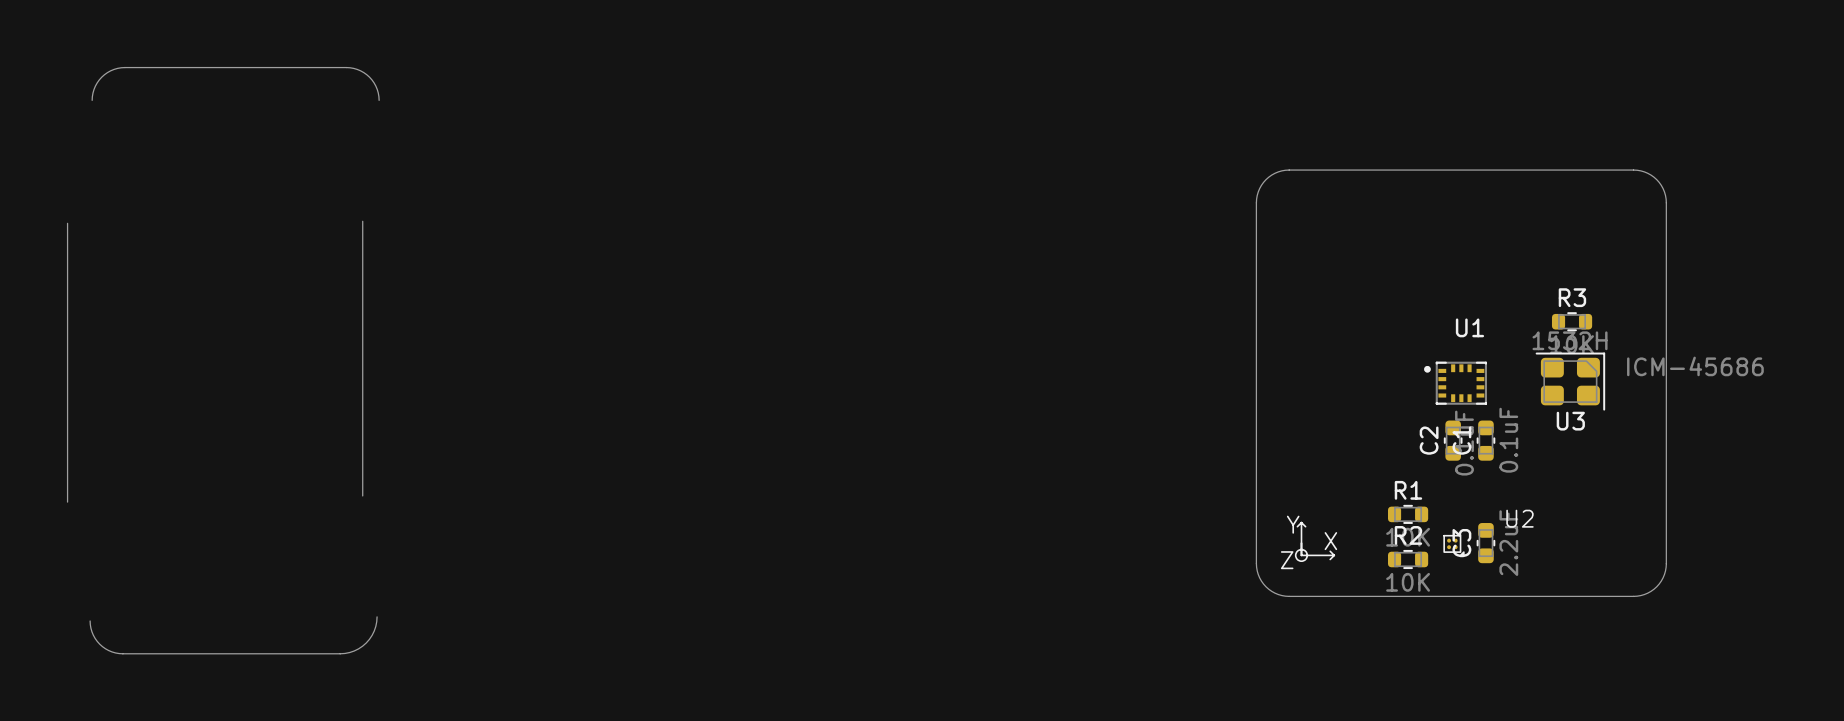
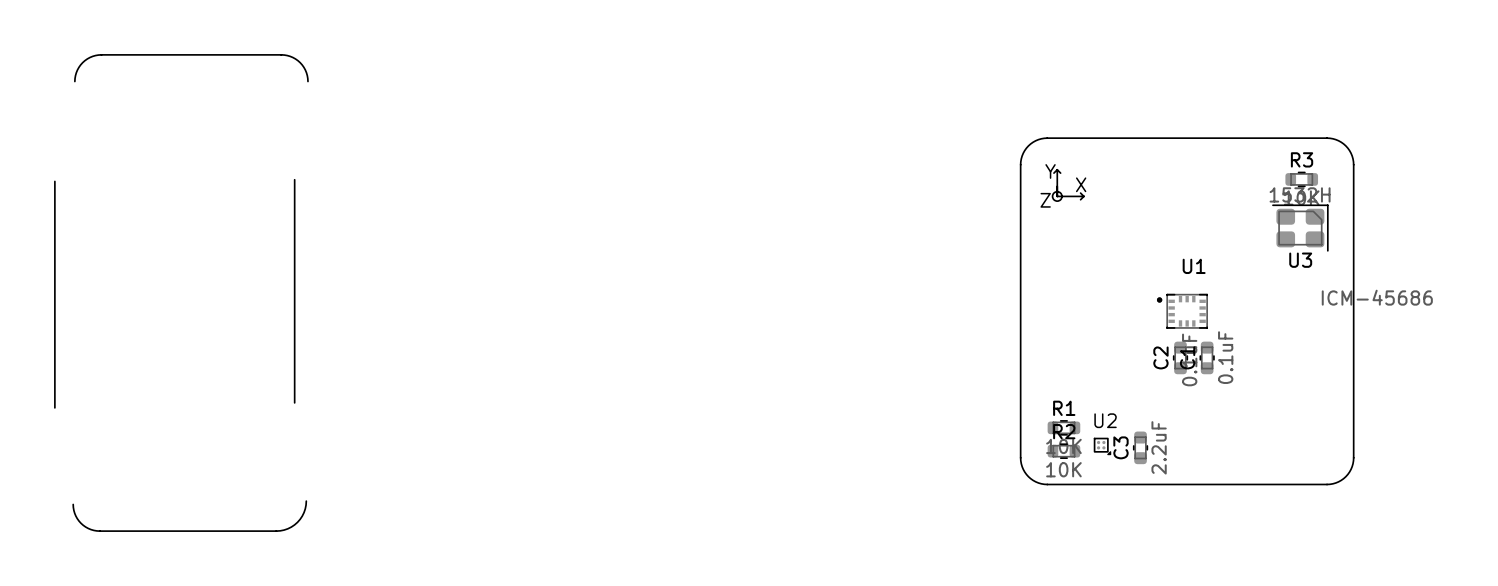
R3 position: (1572, 321) -> (1301, 179)
U3 position: (1570, 381) -> (1300, 228)
R1 position: (1408, 514) -> (1063, 427)
U2 name position: U2 (1519, 518) -> U2 (1105, 420)
line: (1301, 522) (1301, 555) (1334, 555) -> (1057, 169) (1057, 196) (1083, 196)
line: (1301, 522) (1305, 526) -> (1057, 169) (1060, 173)
line: (1301, 522) (1297, 526) -> (1057, 169) (1053, 173)
text position: Y (1293, 524) -> Y (1050, 171)
text position: X (1330, 541) -> X (1081, 184)
C3 position: (1485, 543) -> (1140, 447)
U2 position: (1453, 545) -> (1102, 446)
line: (1330, 551) (1334, 555) -> (1080, 193) (1083, 196)
drawing position: (1301, 555) -> (1057, 196)
line: (1334, 555) (1330, 559) -> (1083, 196) (1080, 199)
R2 position: (1408, 559) -> (1063, 451)
text position: Z (1287, 560) -> Z (1045, 200)

